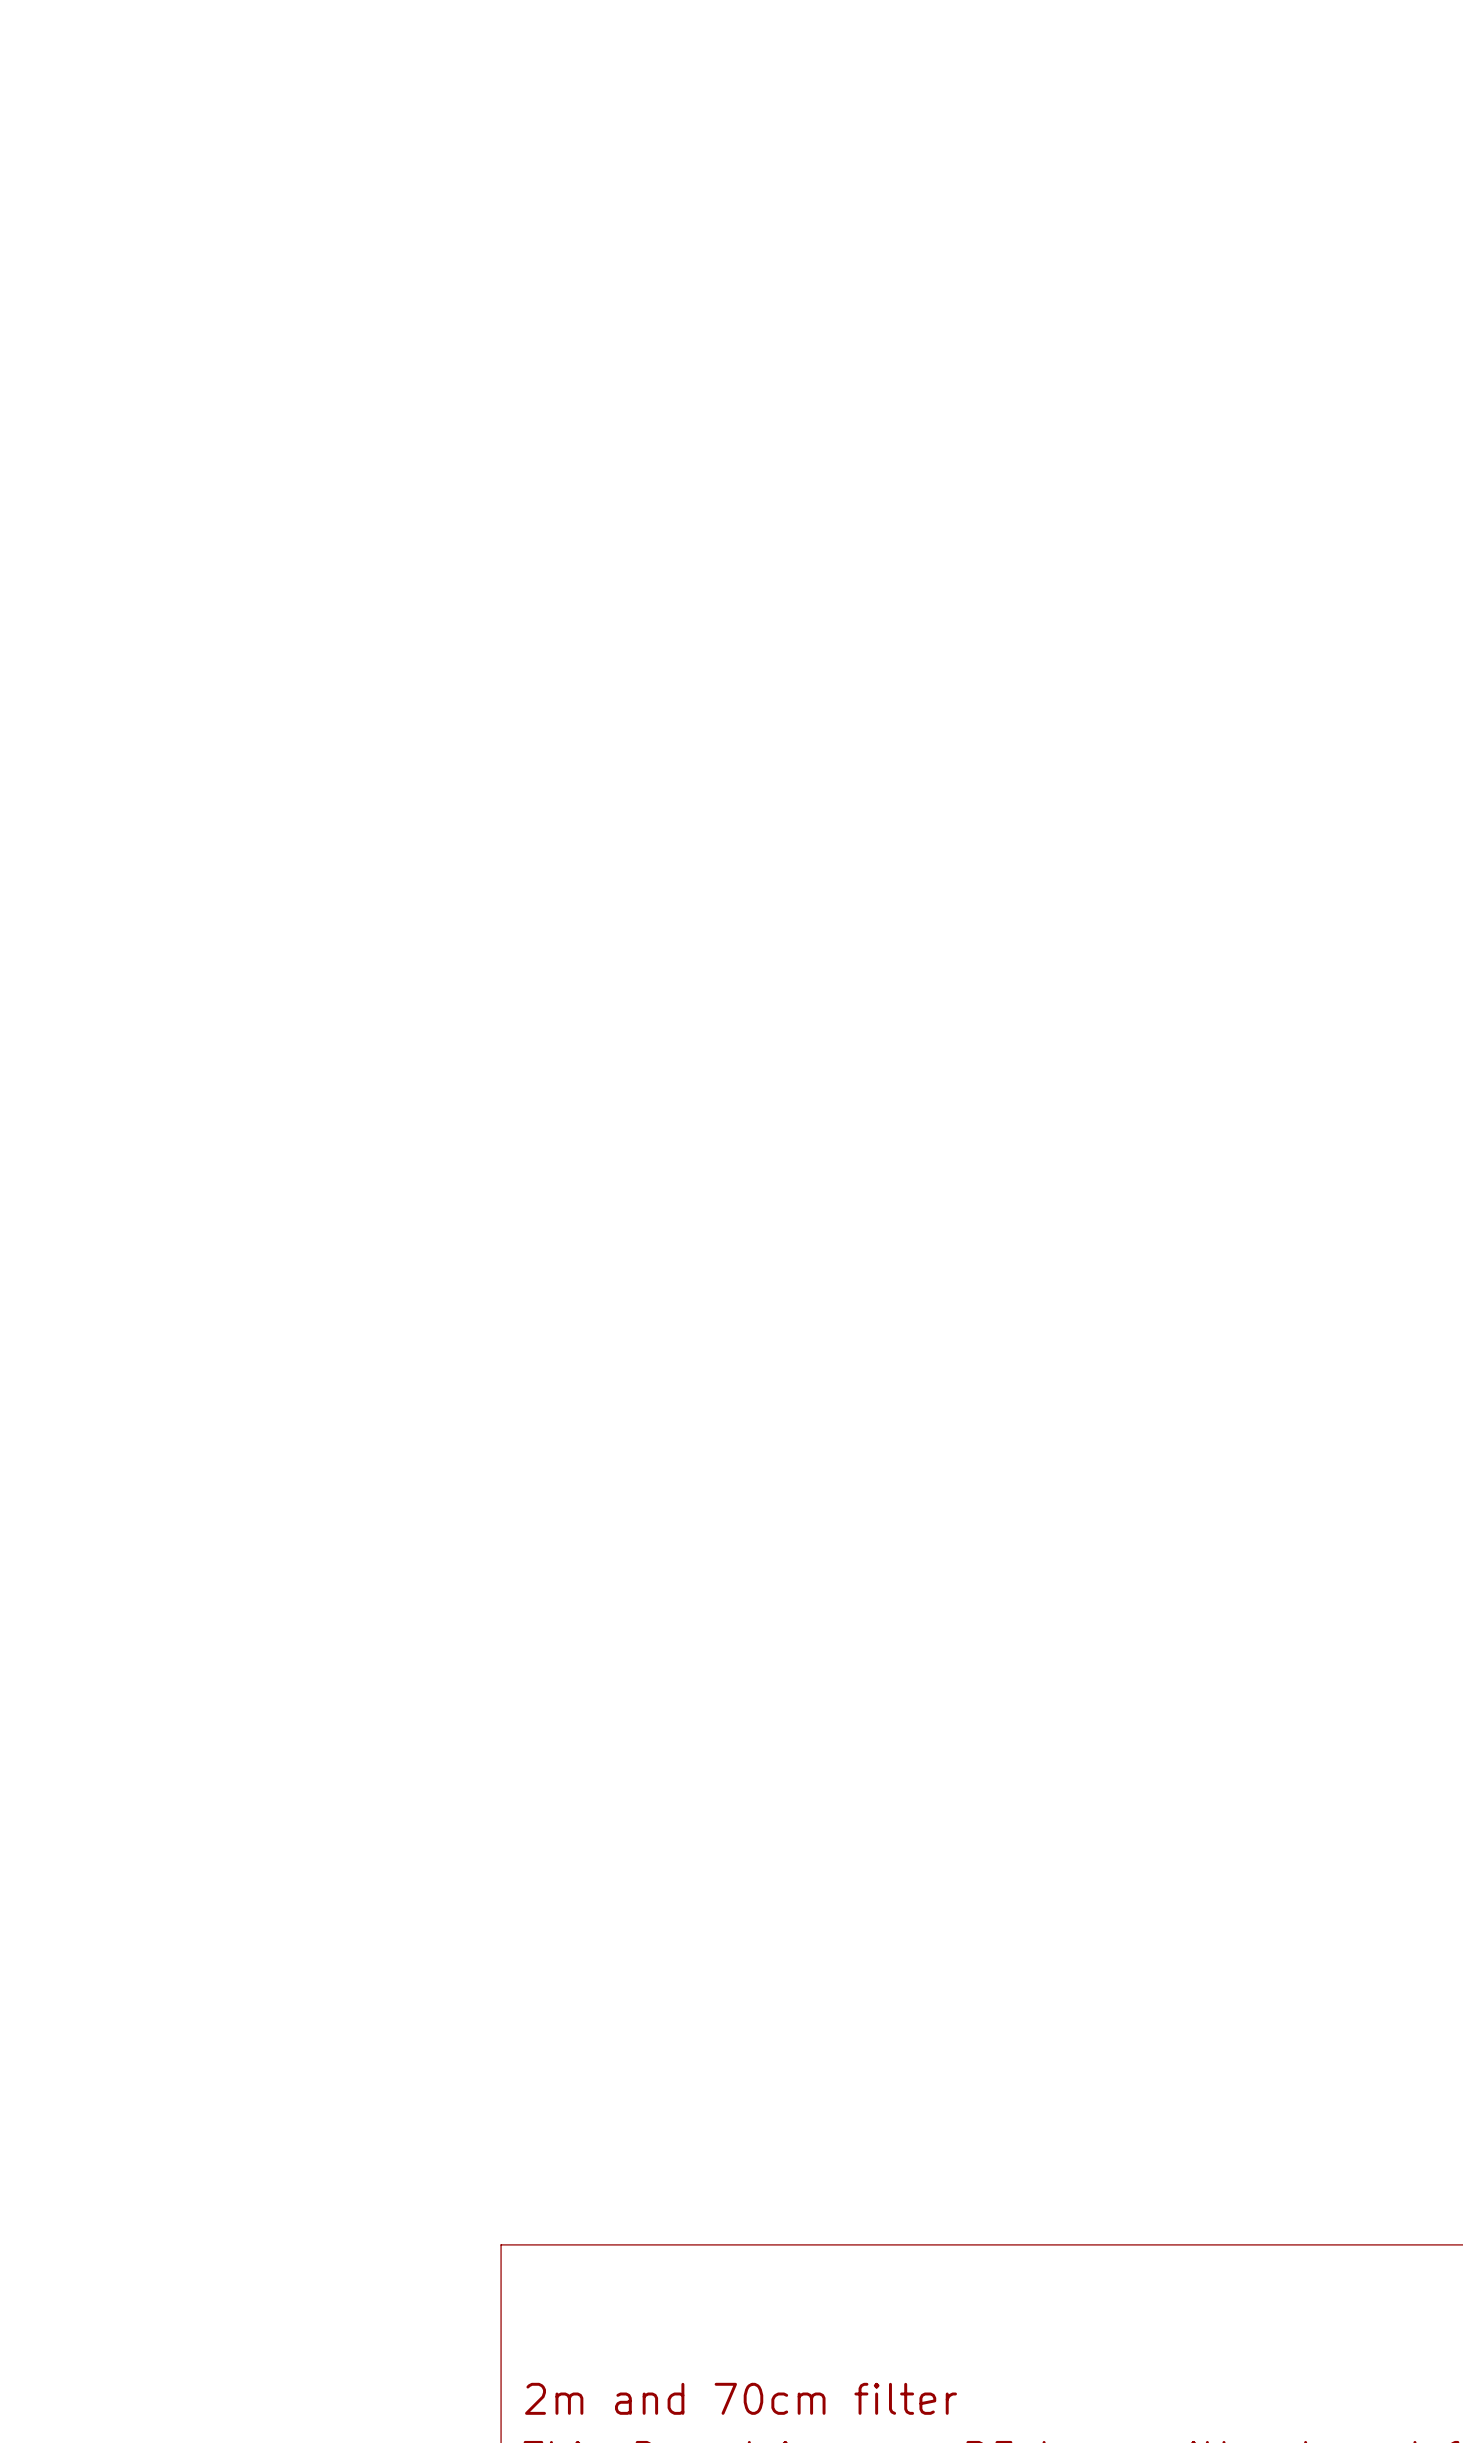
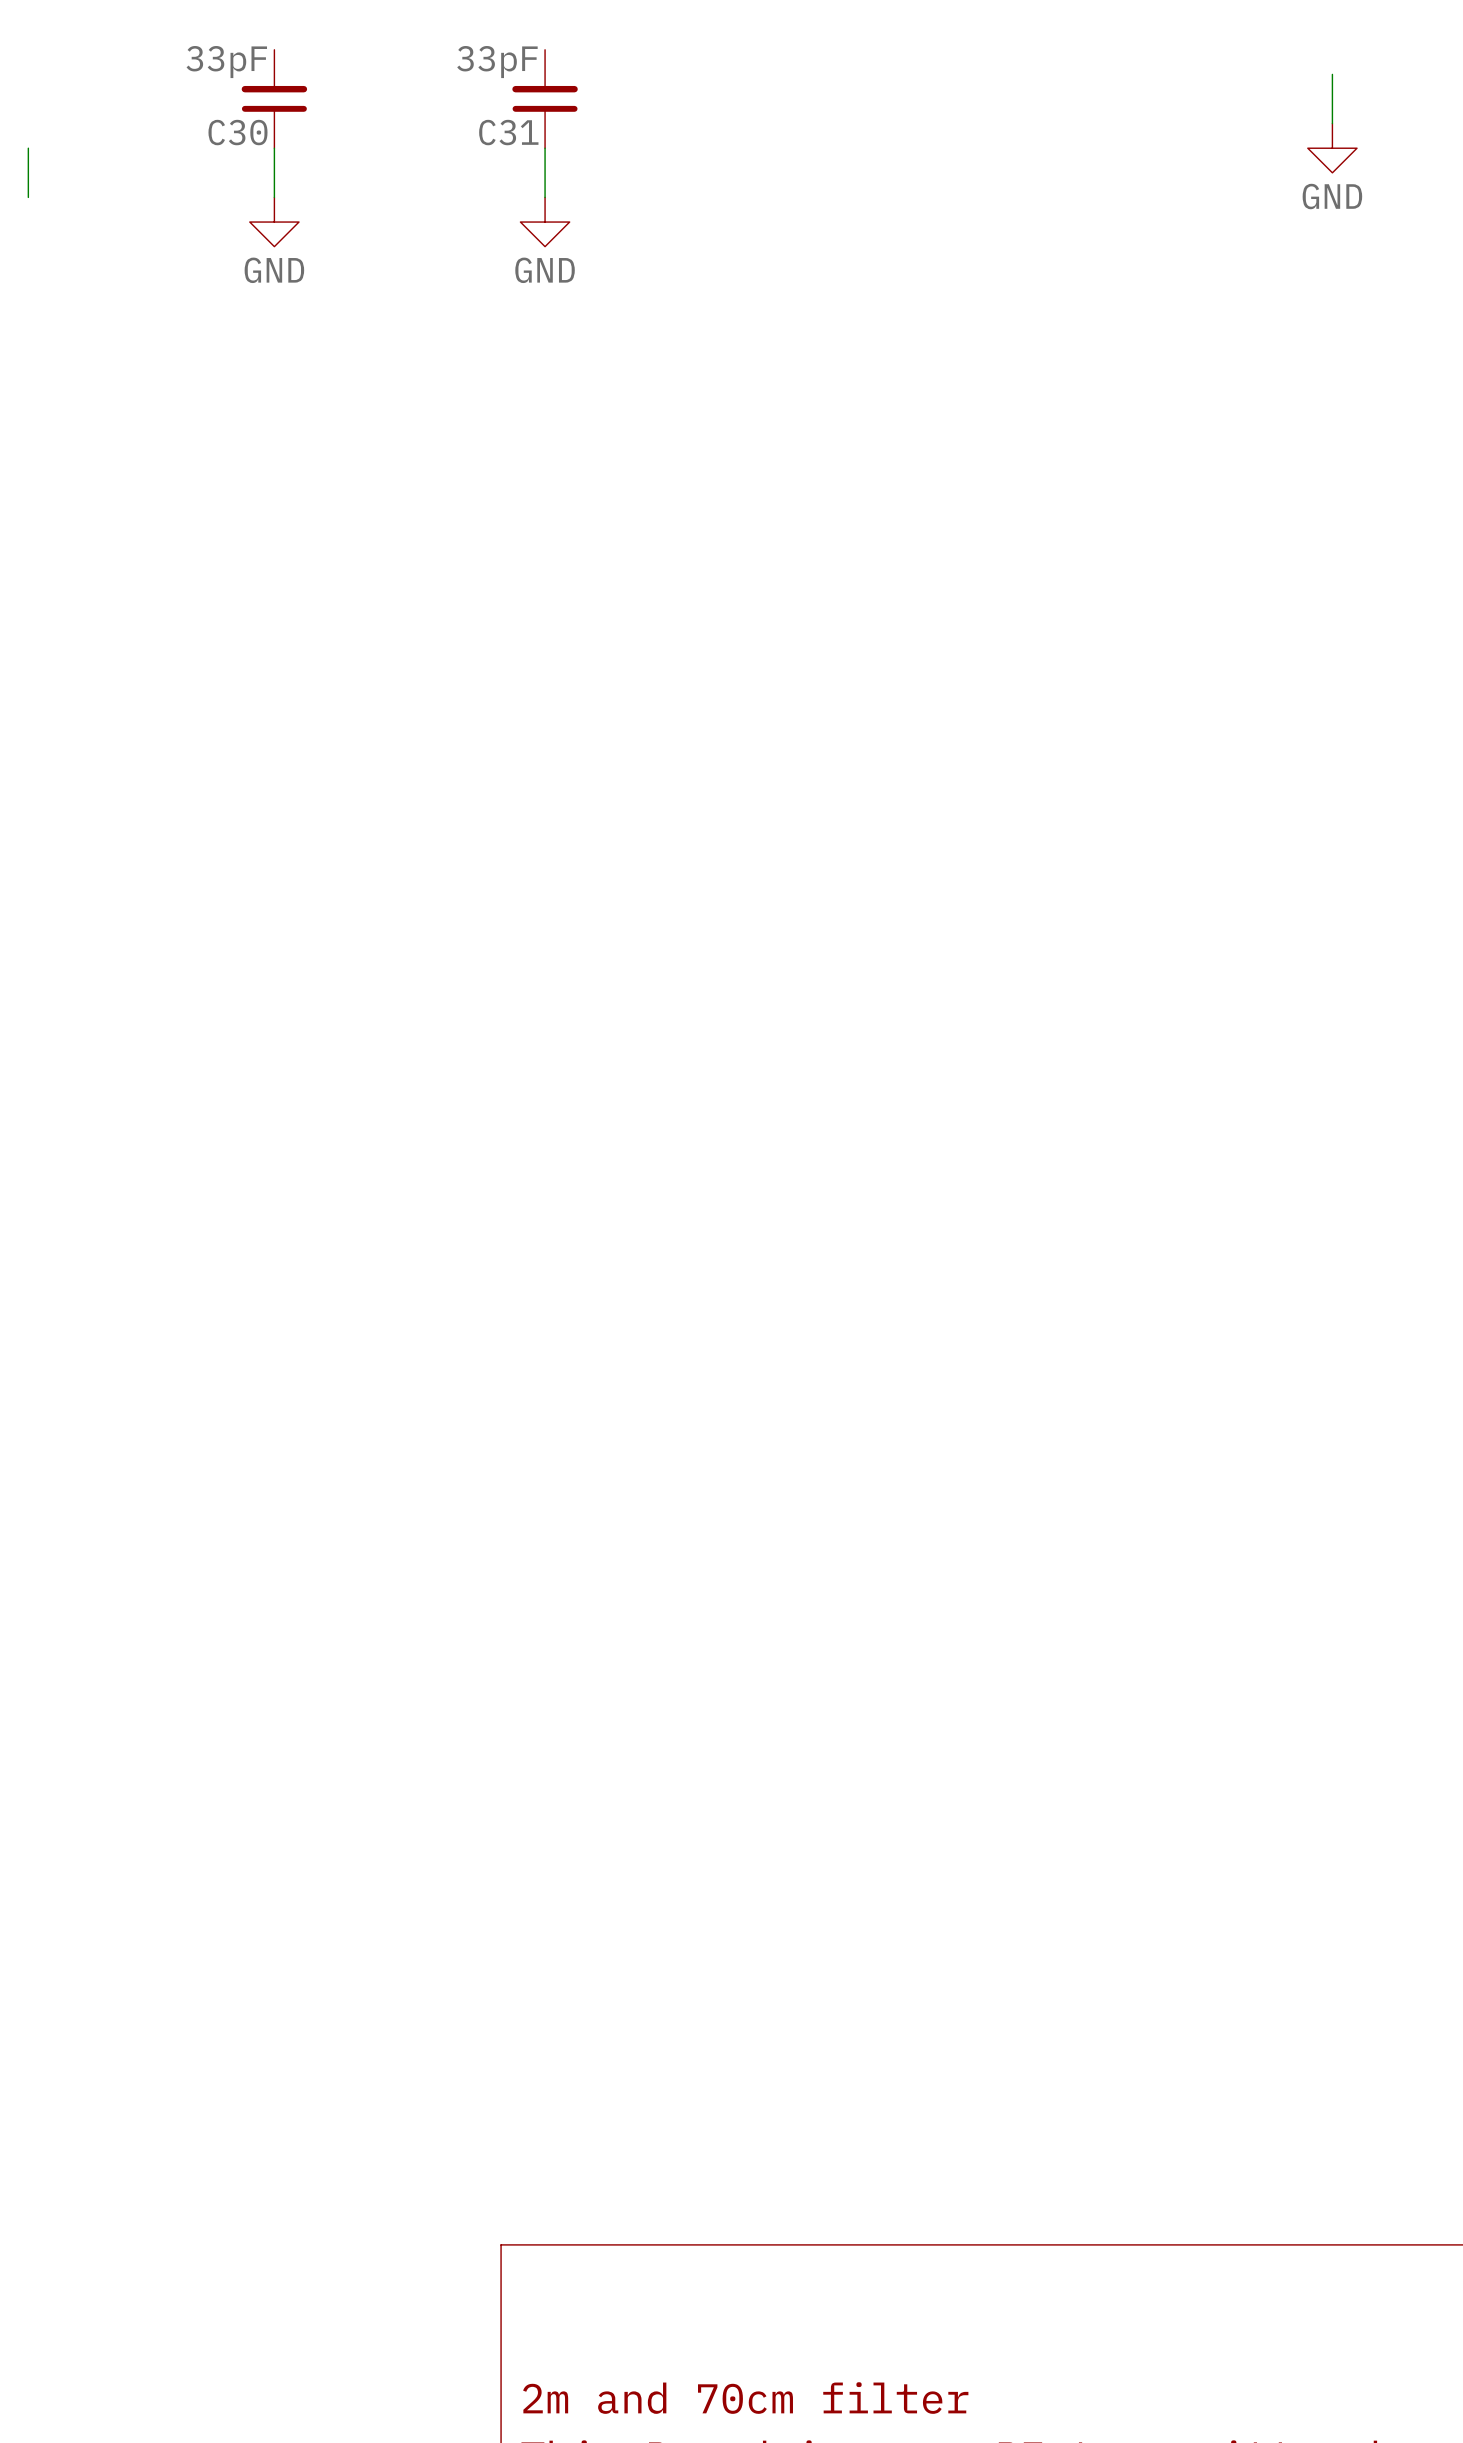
wire: none -> (1332, 74) (1332, 123)
C30: none -> 33pF (274, 99)
C31: none -> 33pF (545, 99)
wire: none -> (28, 148) (28, 197)
wire: none -> (274, 148) (274, 197)
wire: none -> (545, 148) (545, 197)
power symbol: none -> GND (1332, 148)
power symbol: none -> GND (274, 222)
power symbol: none -> GND (545, 222)

